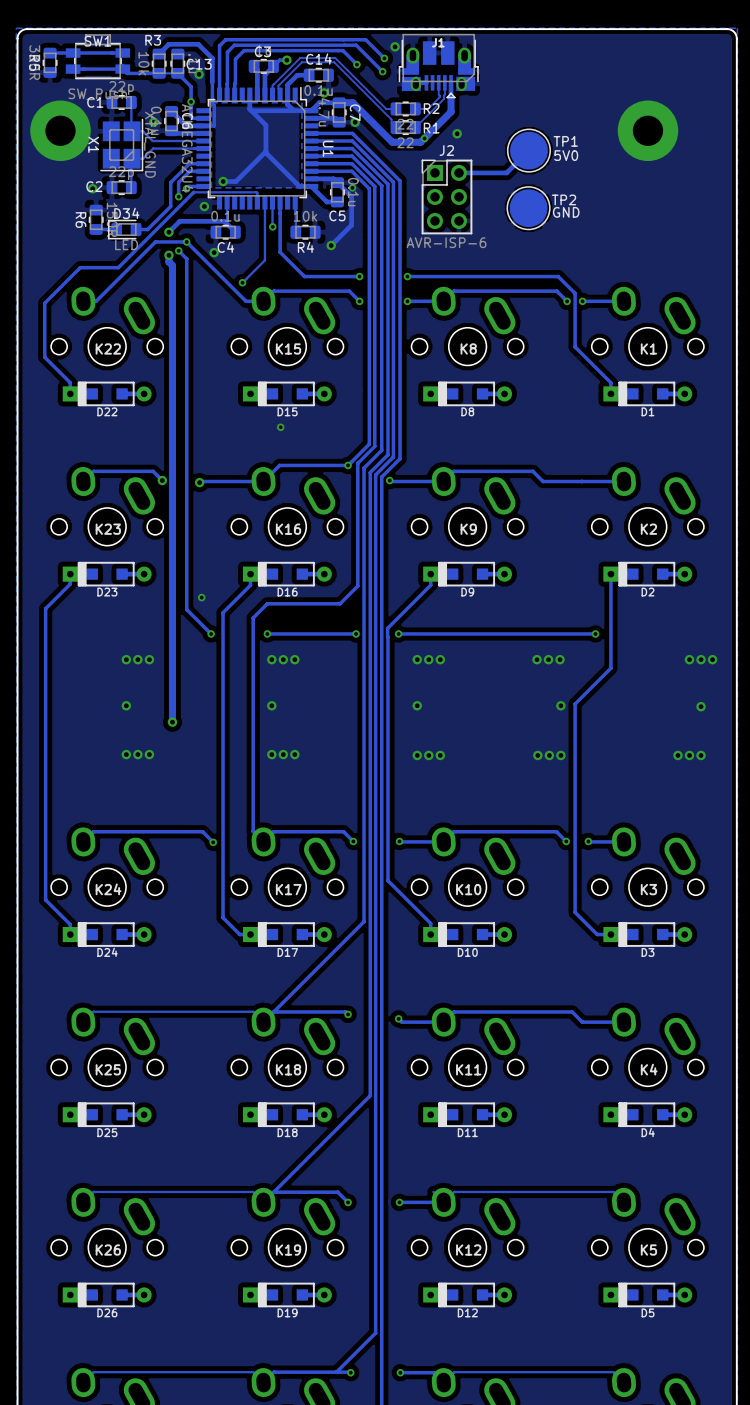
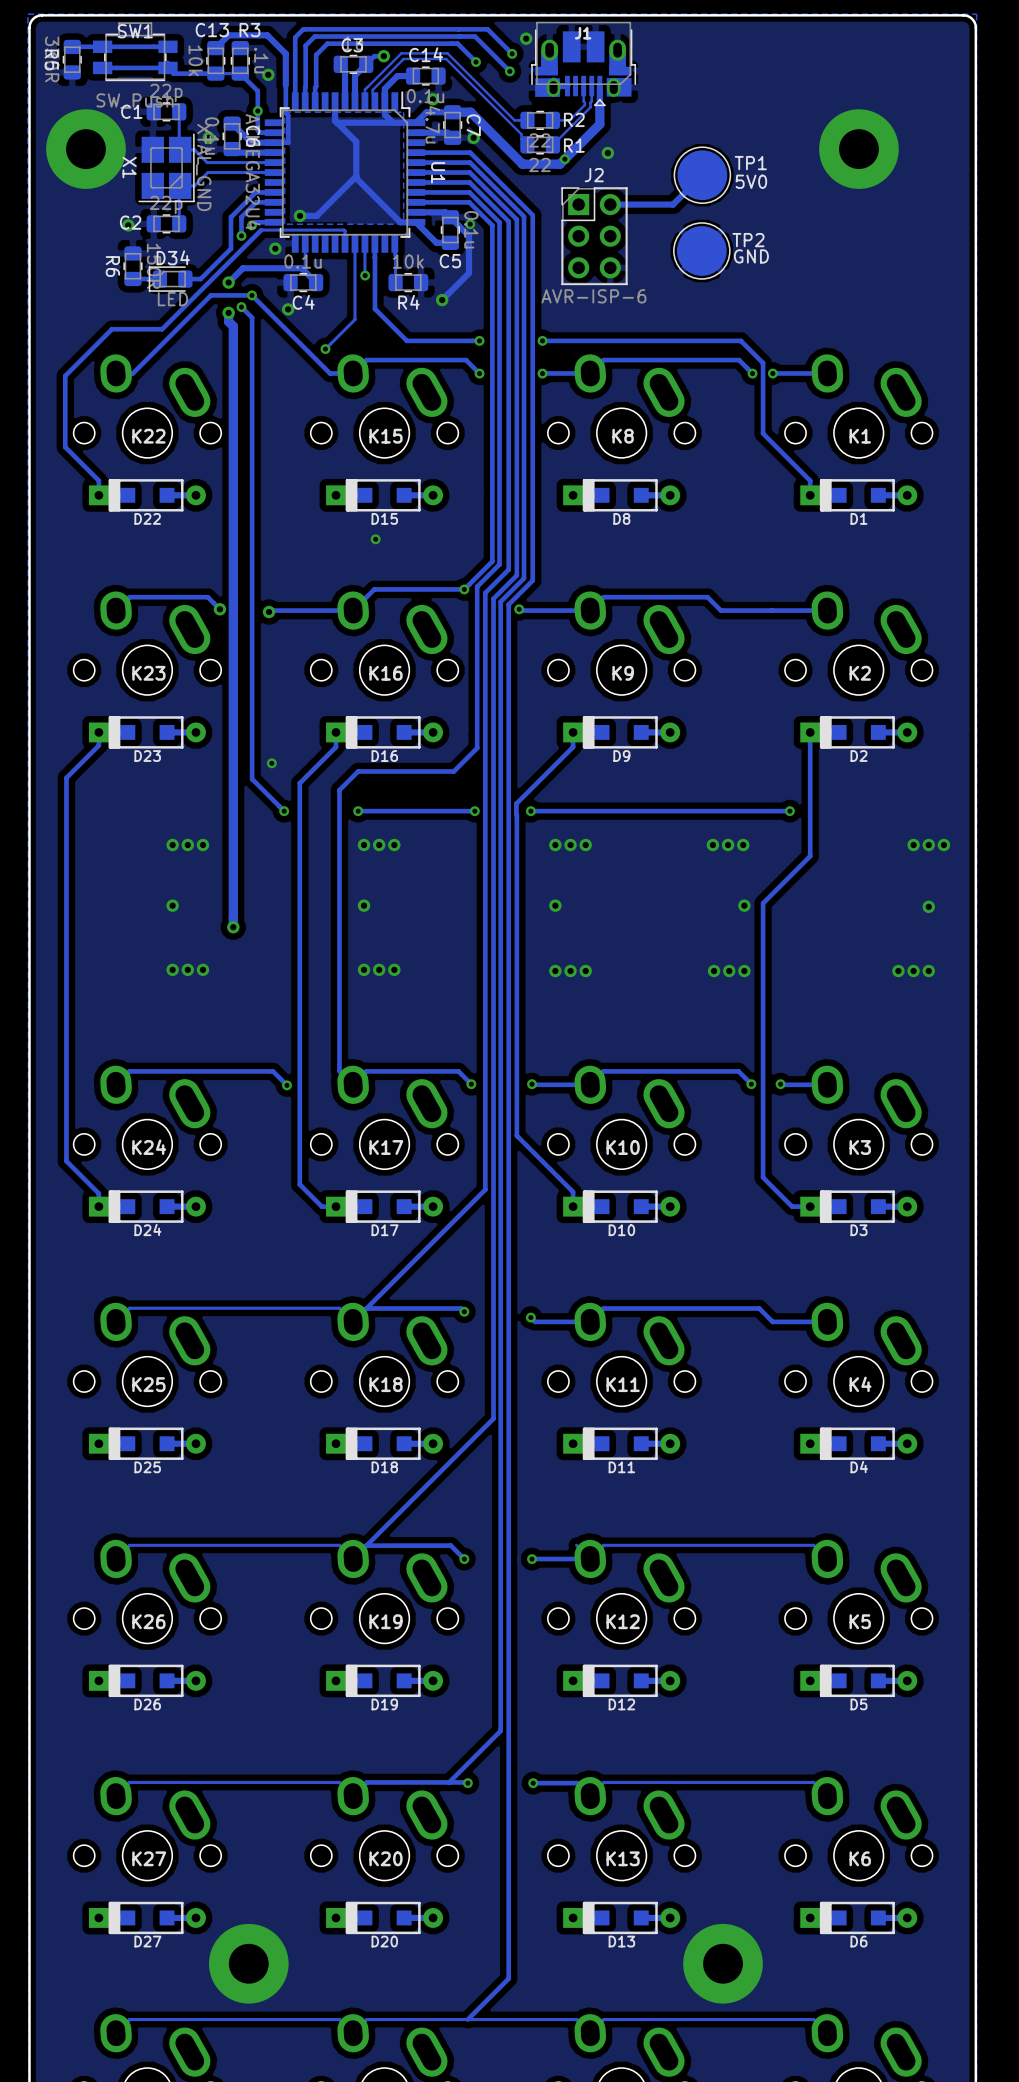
R3 name position: R3 (153, 40) -> R3 (249, 30)
C13 name position: C13 (199, 64) -> C13 (212, 30)

